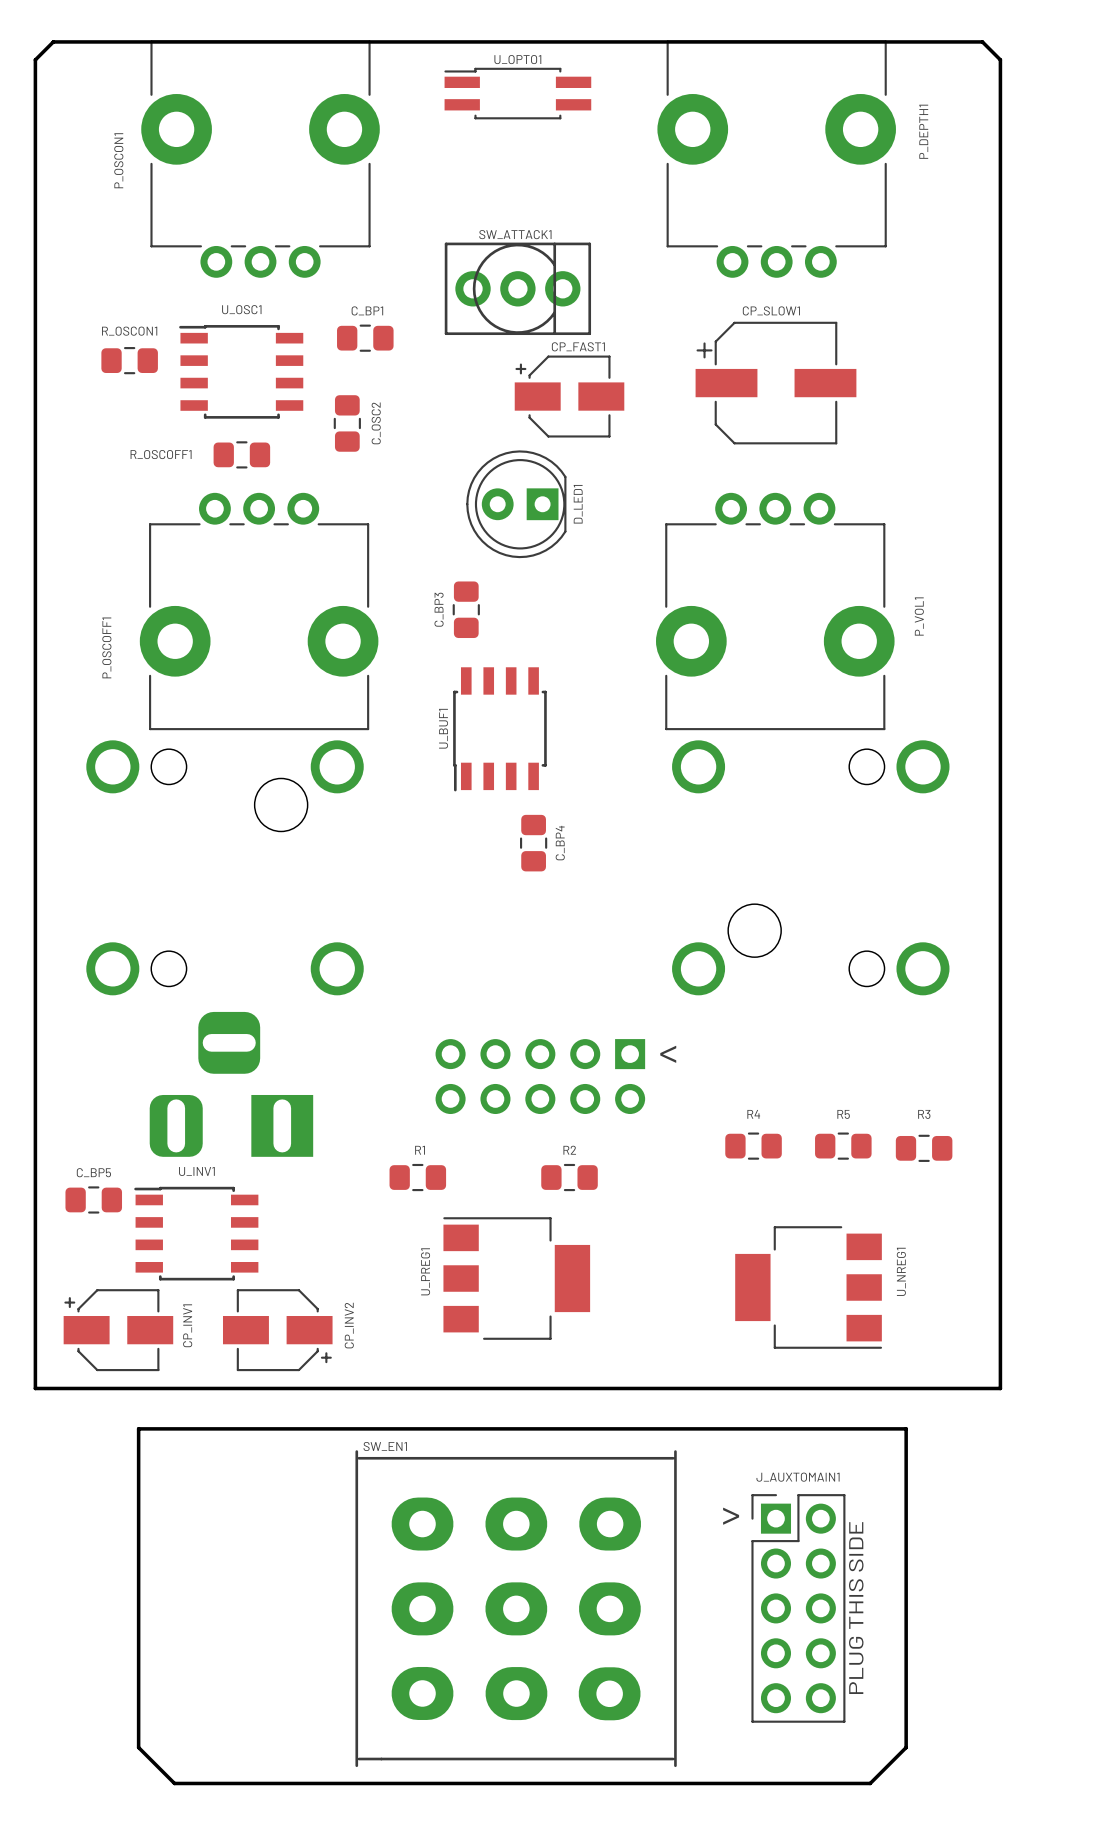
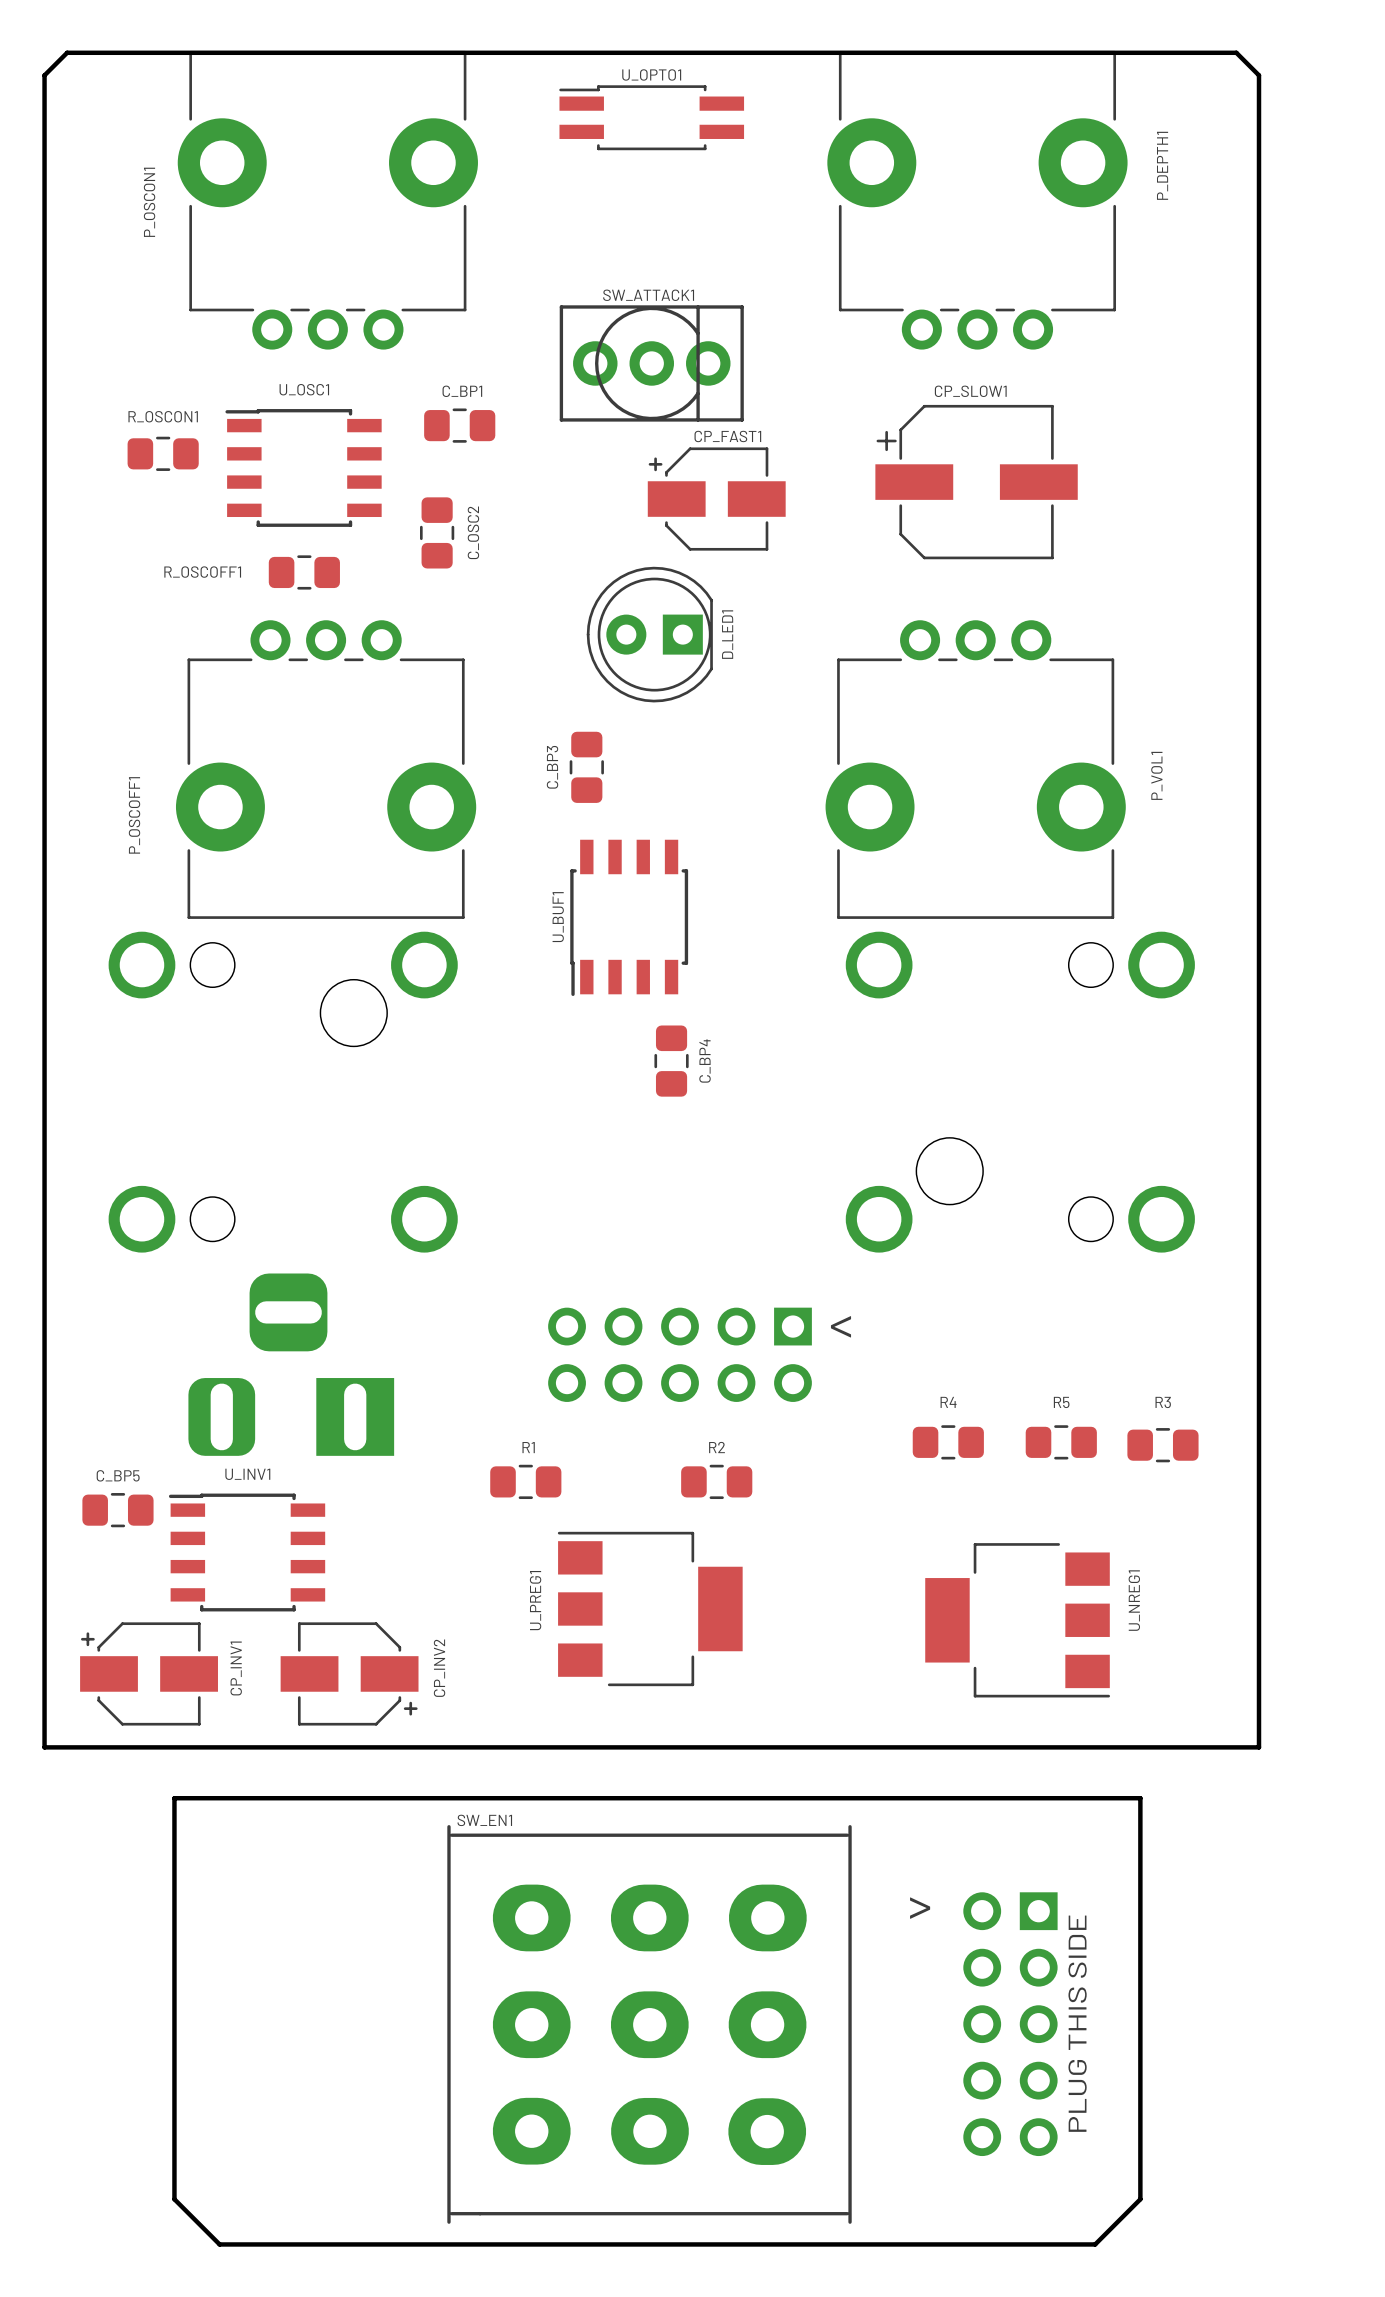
J_AUXTOMAIN1 side: top (798, 1608) -> bottom (1010, 2024)

